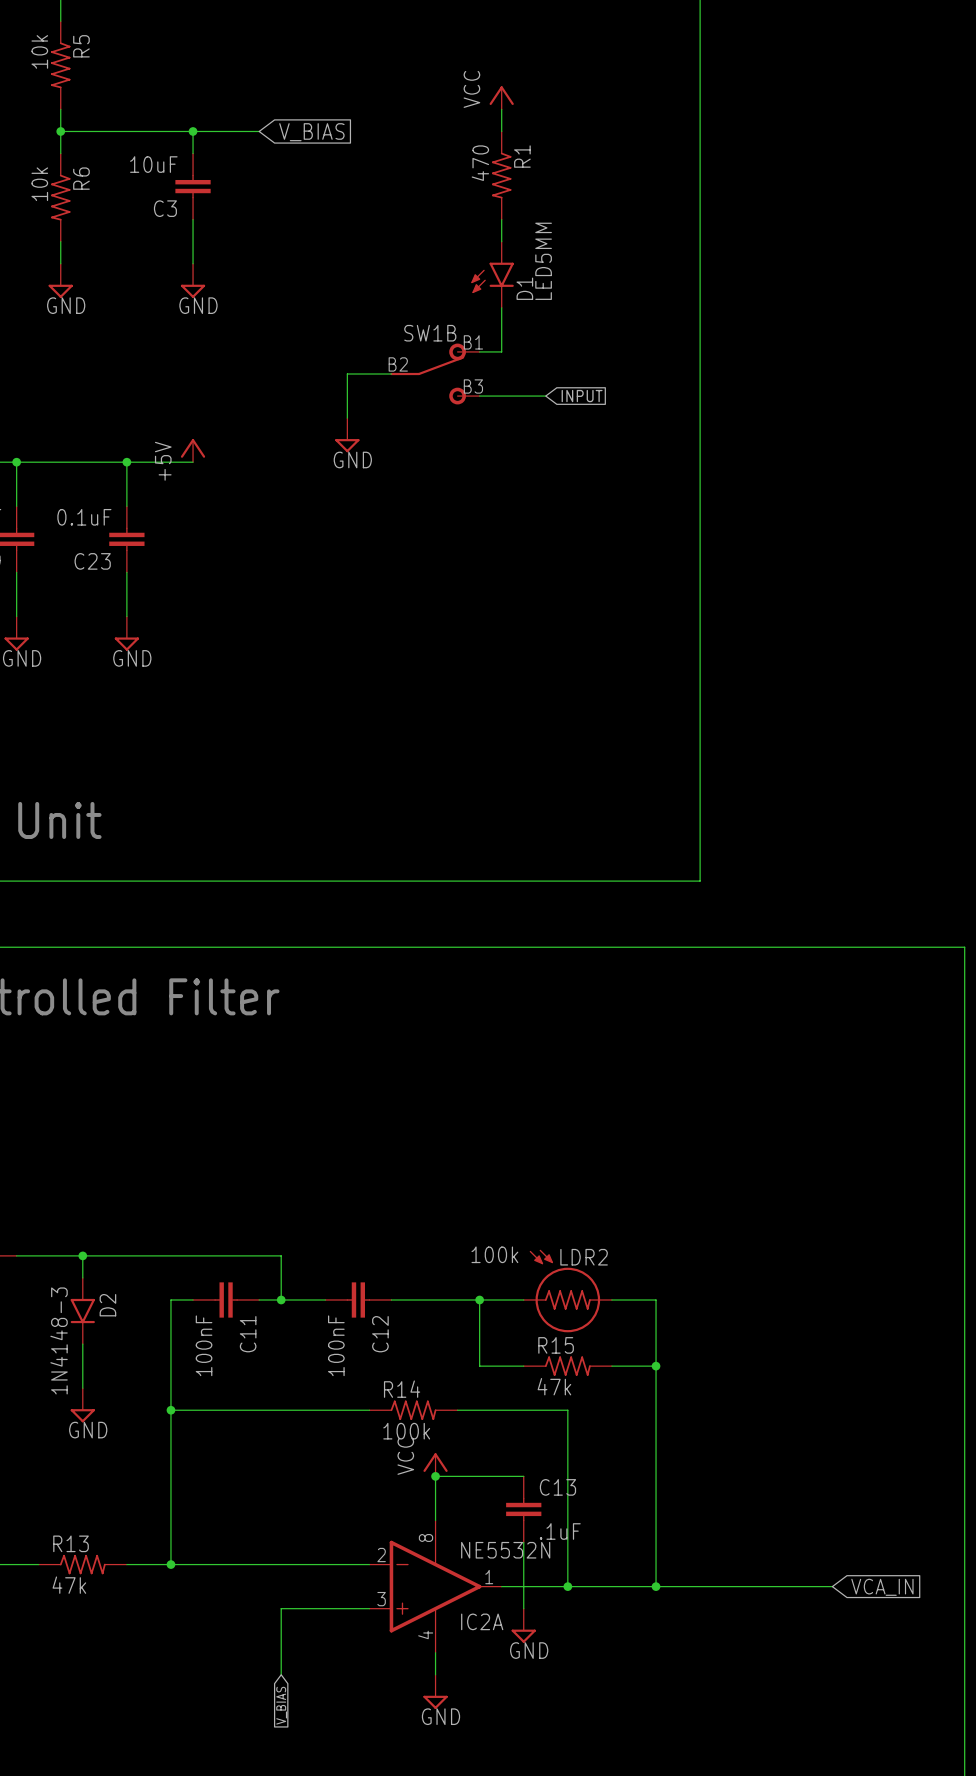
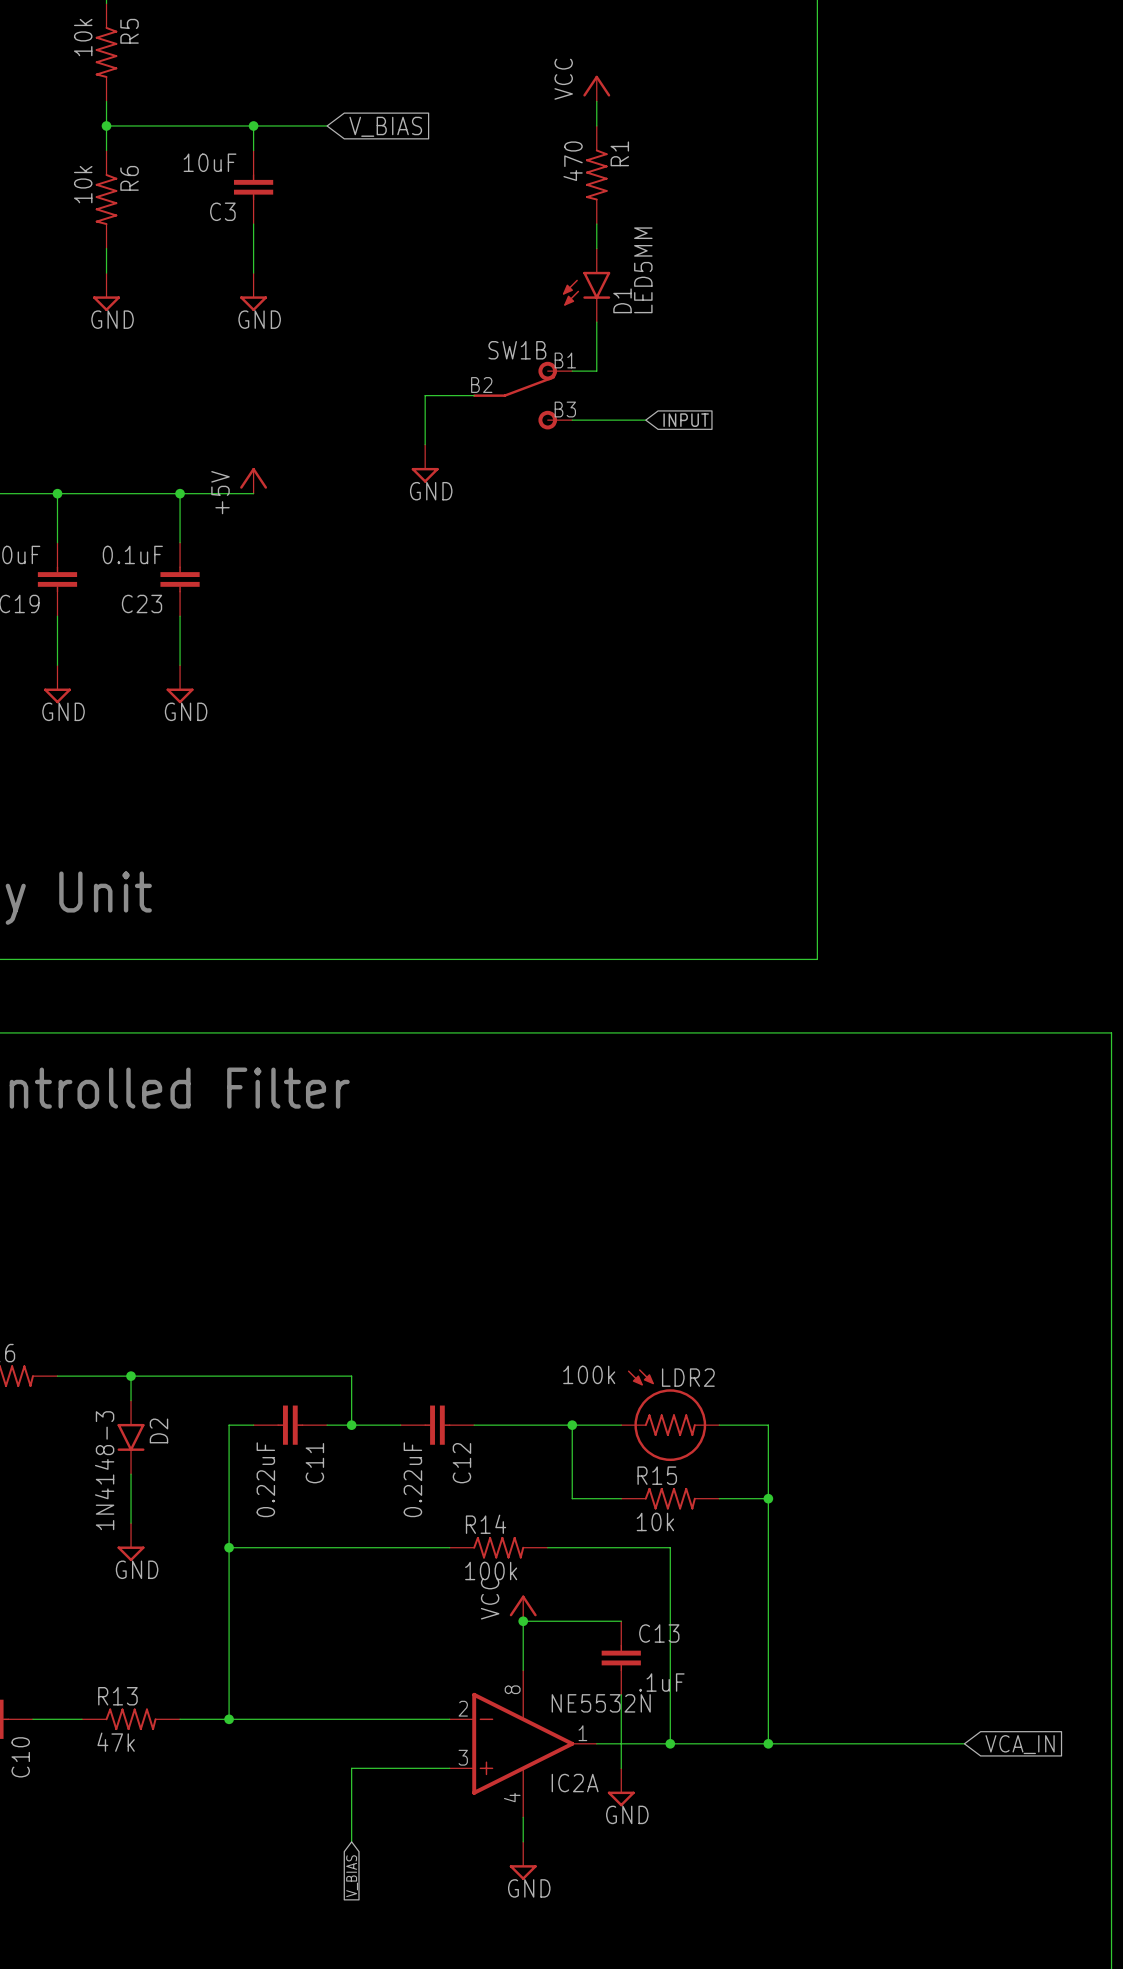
C11 value: 100nF (204, 1345) -> 0.22uF (265, 1479)
C12 value: 100nF (336, 1345) -> 0.22uF (412, 1479)
R15 value: 47k (554, 1386) -> 10k (655, 1521)

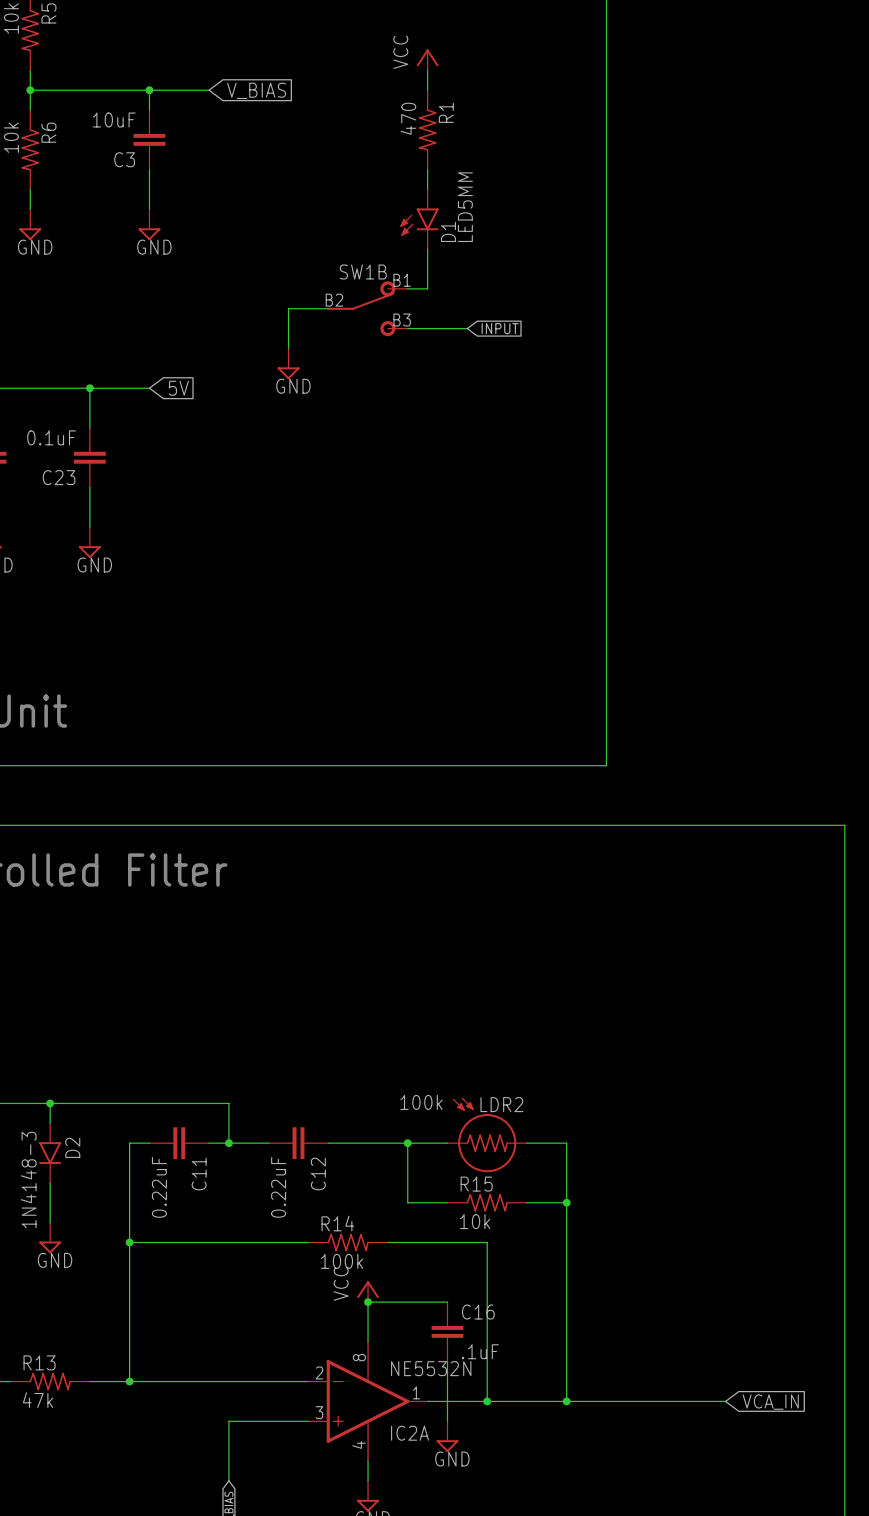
power symbol: +5V (253, 480) -> none
global label: none -> 5V (178, 388)
C13 name: C13 (659, 1633) -> C16 (478, 1312)

